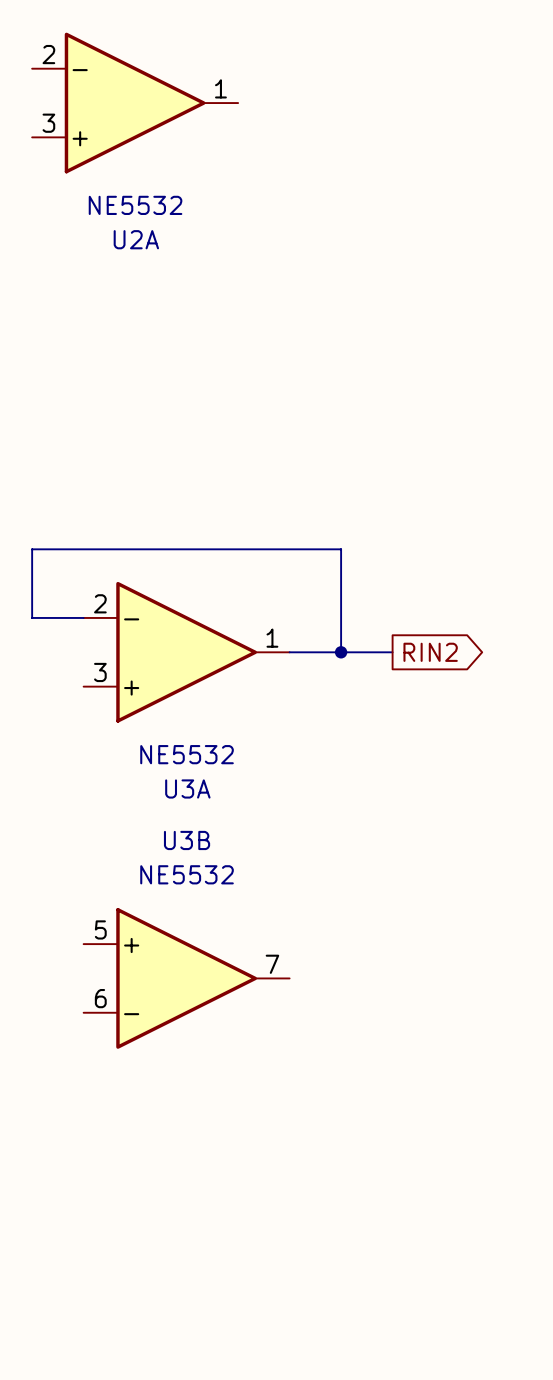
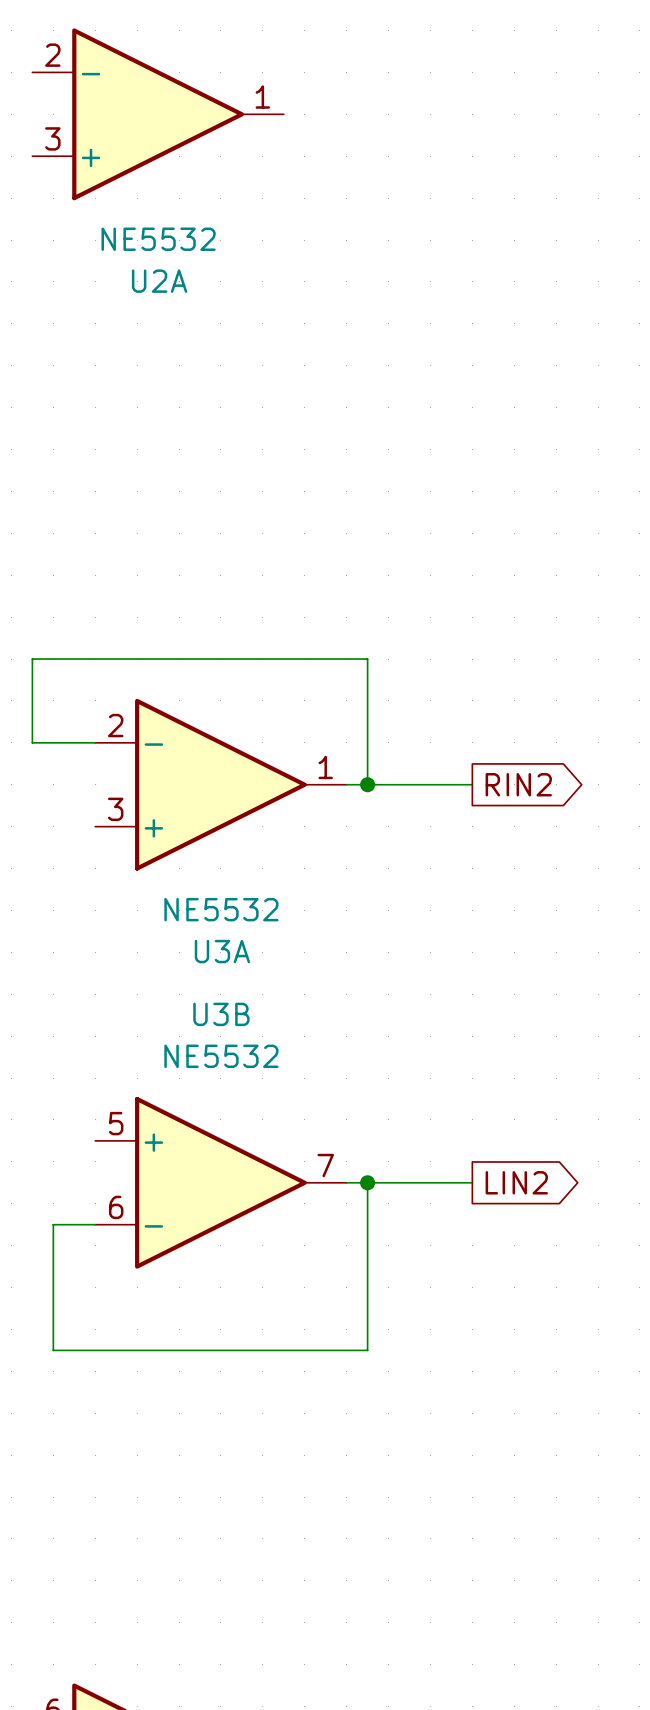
wire: (306, 549) (341, 549) (341, 652) -> (367, 659) (367, 784)
junction position: (341, 652) -> (367, 784)
wire: none -> (346, 1182) (472, 1182)
wire: none -> (367, 1182) (367, 1350) (53, 1350) (53, 1224) (95, 1224)
junction: none -> (367, 1182)
global label: none -> LIN2 (516, 1182)

